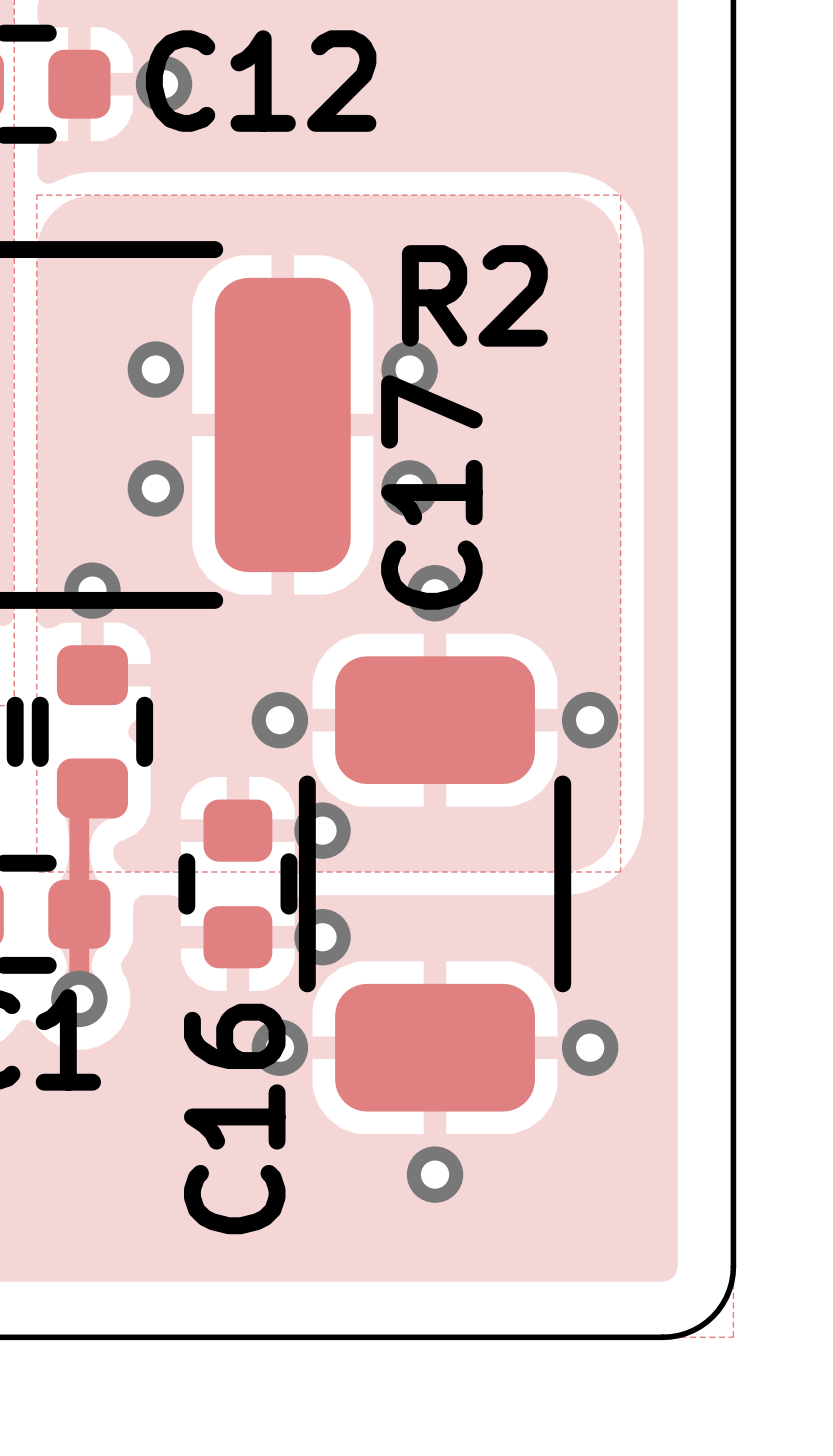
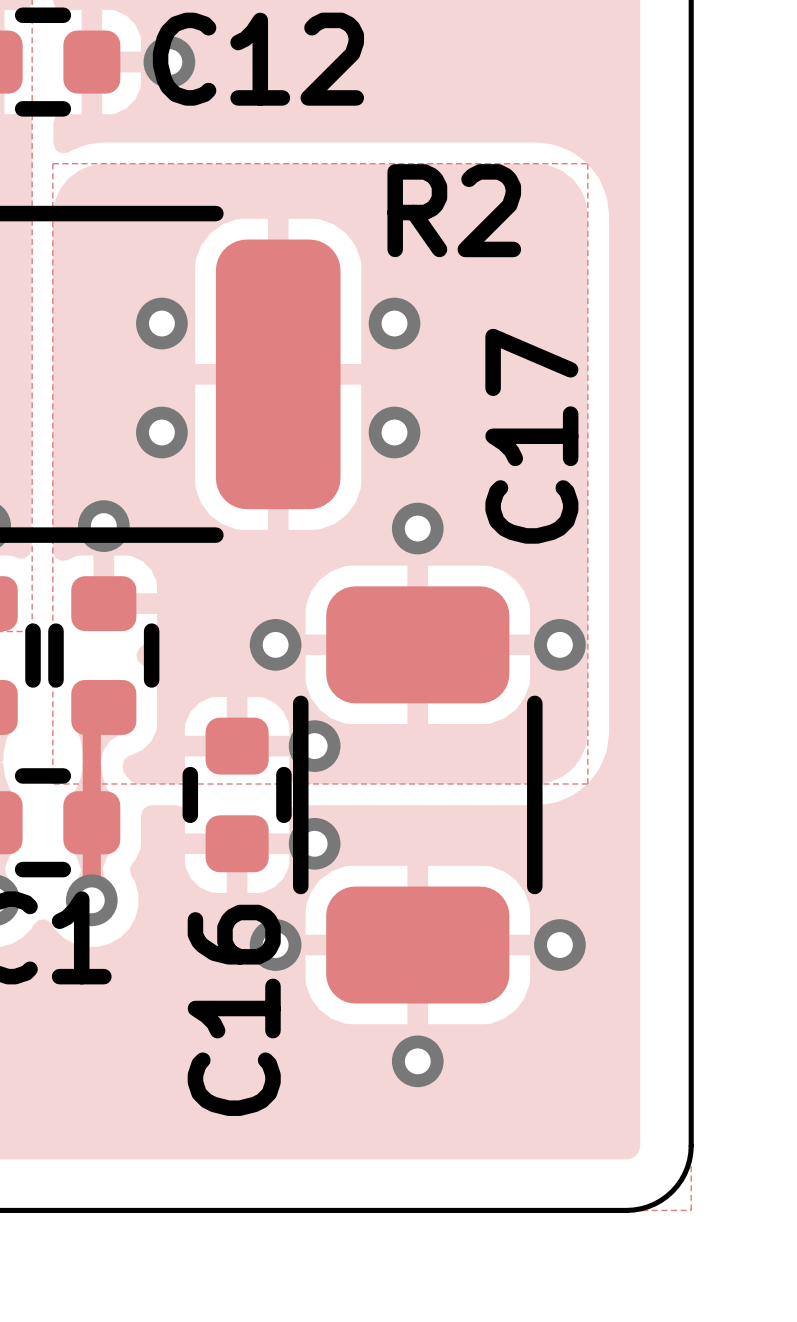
R2 name position: R2 (474, 295) -> R2 (454, 210)
C17 name position: C17 (431, 492) -> C17 (531, 436)

